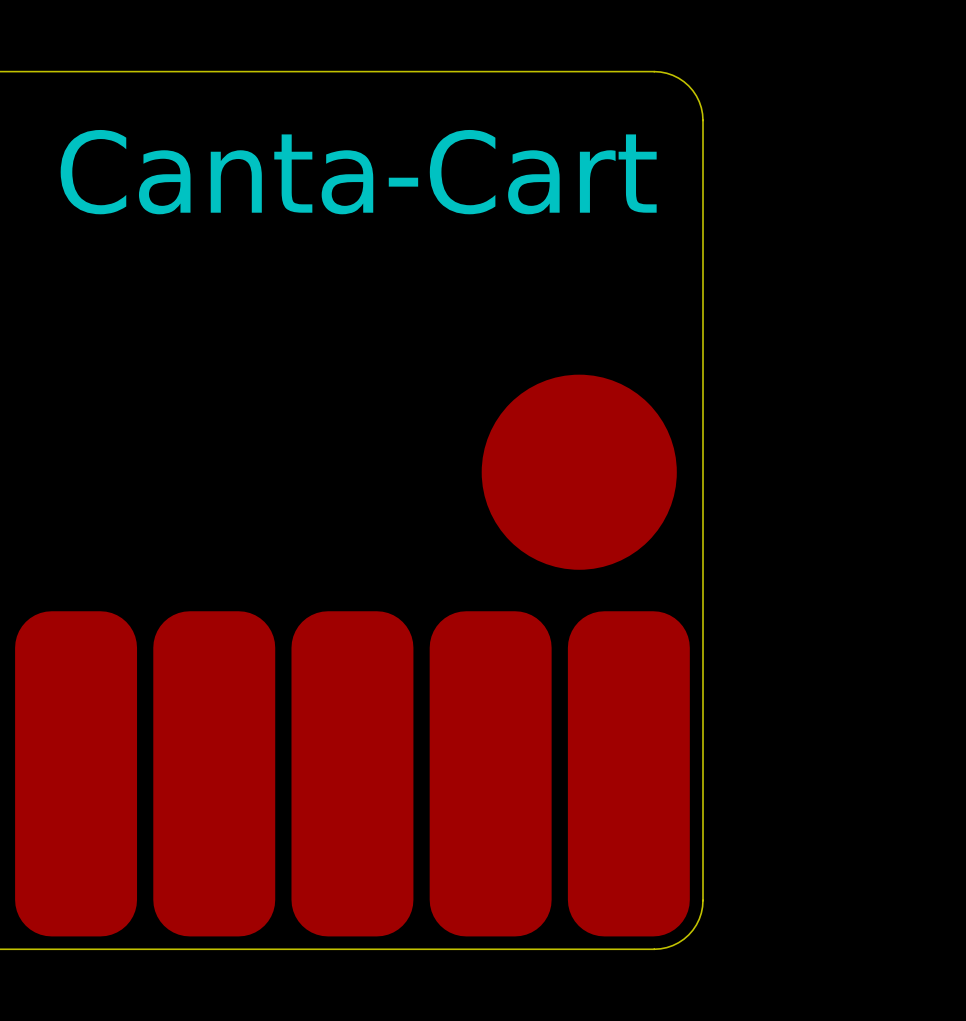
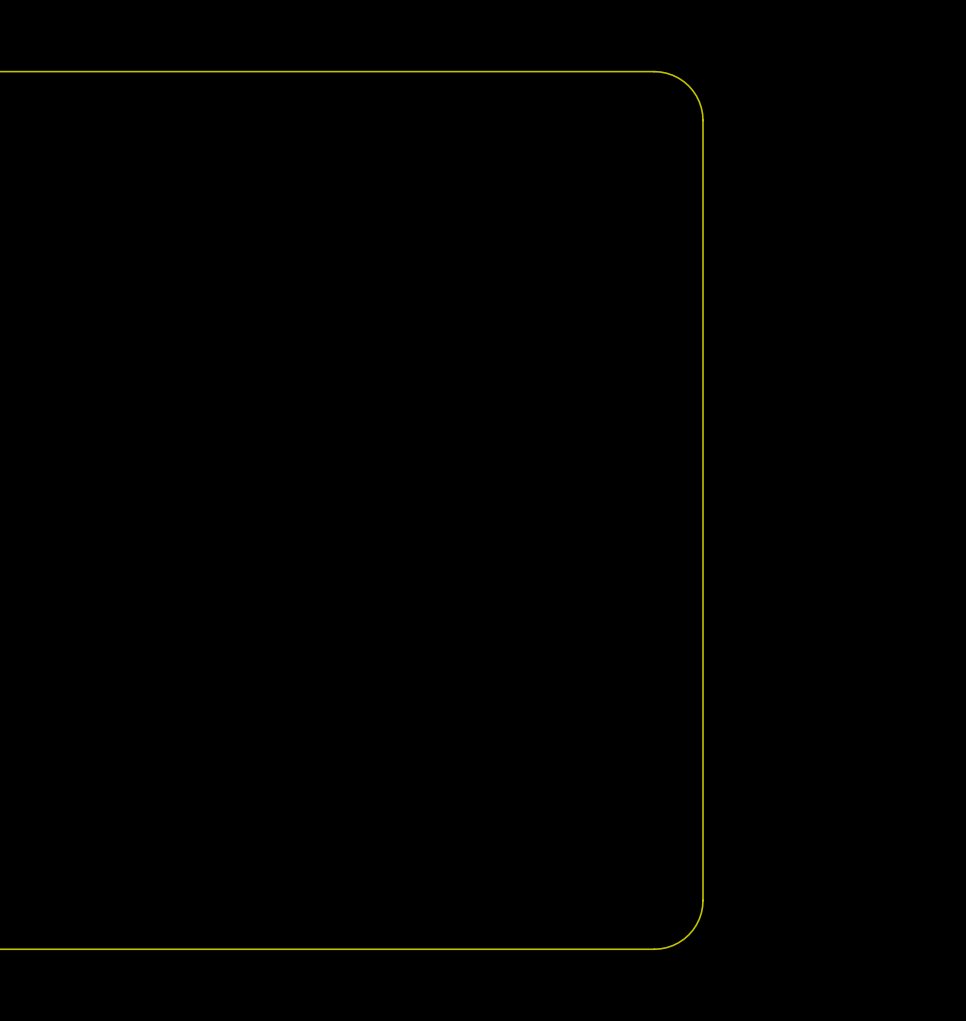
text: Canta-Cart (358, 172) -> none
part: (579, 472) -> none
part: (76, 773) -> none
part: (214, 773) -> none
part: (352, 773) -> none
part: (490, 773) -> none
part: (628, 773) -> none

